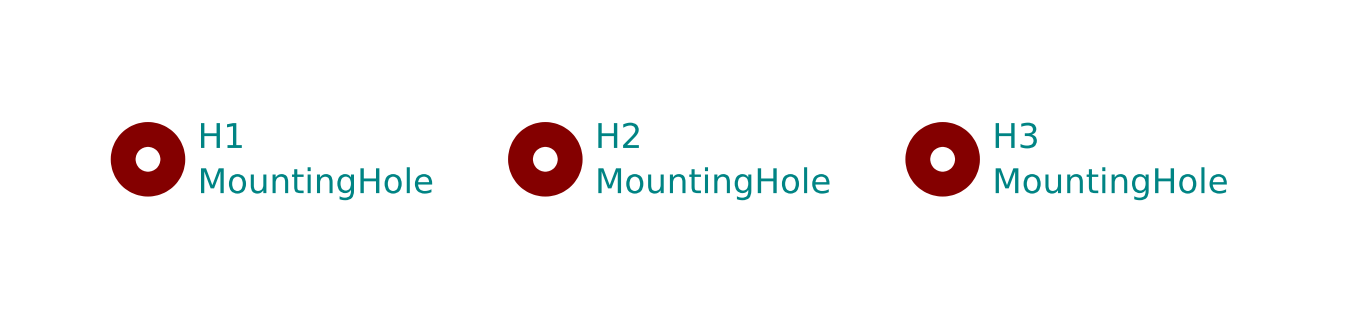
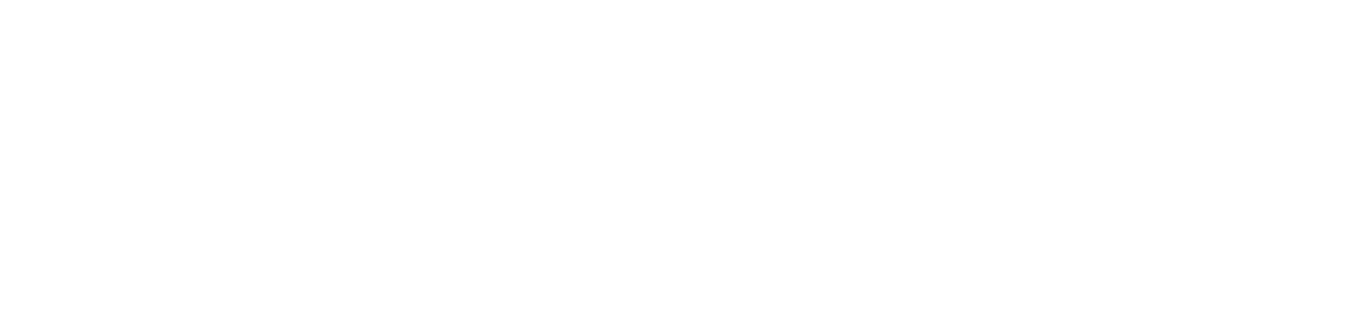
H1: MountingHole (148, 159) -> none
H2: MountingHole (545, 159) -> none
H3: MountingHole (942, 159) -> none

